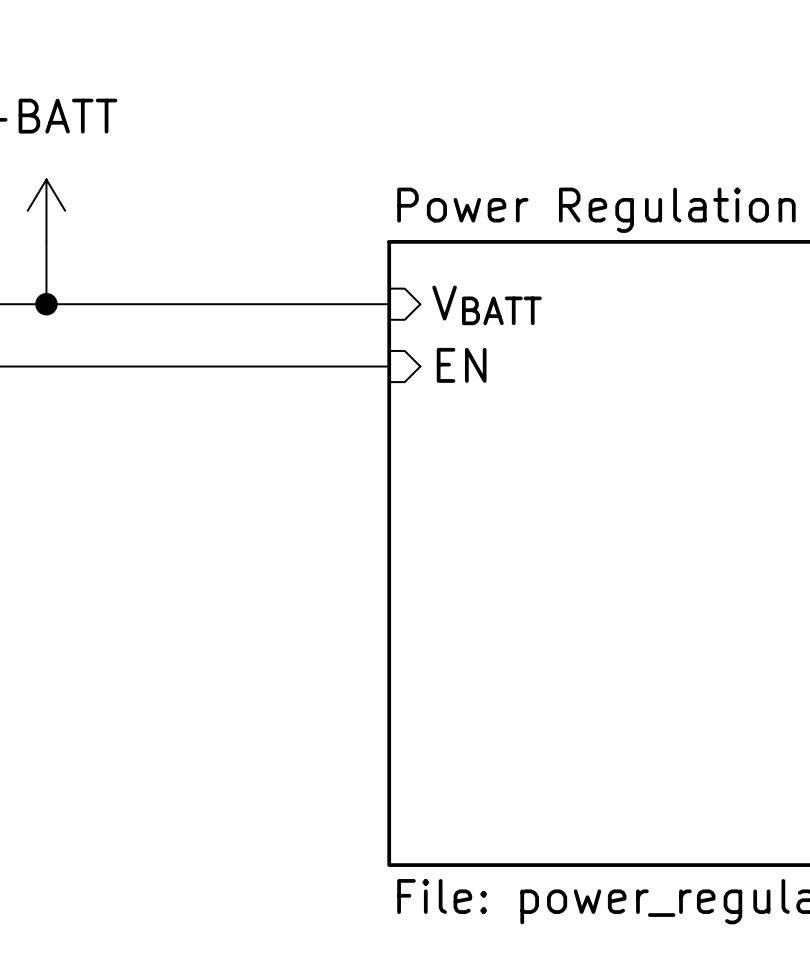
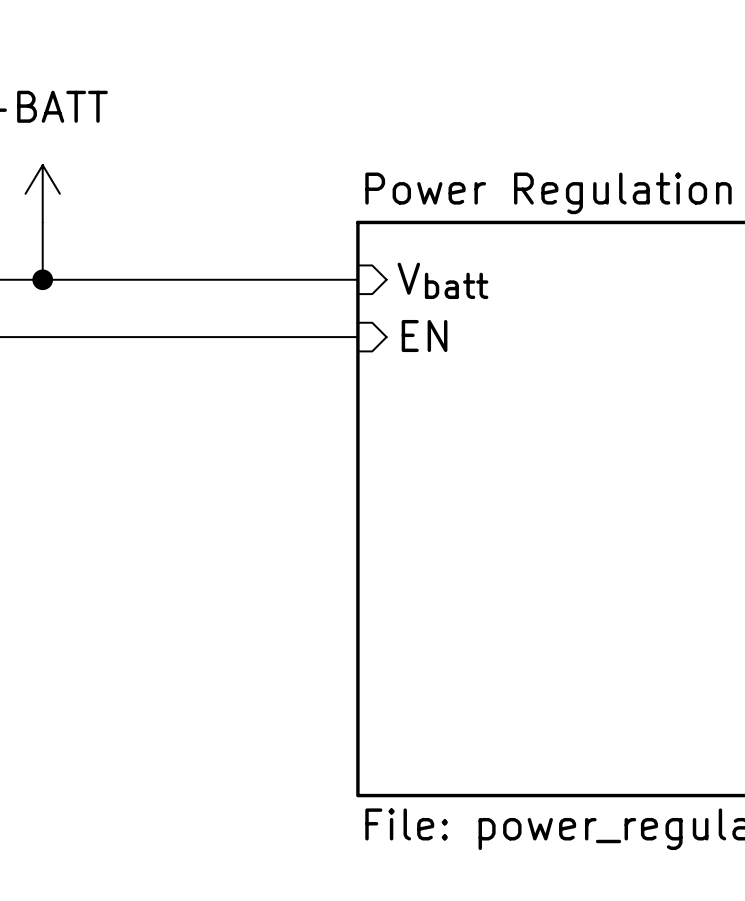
sheet pin: VBATT (487, 305) -> Vbatt (442, 280)

